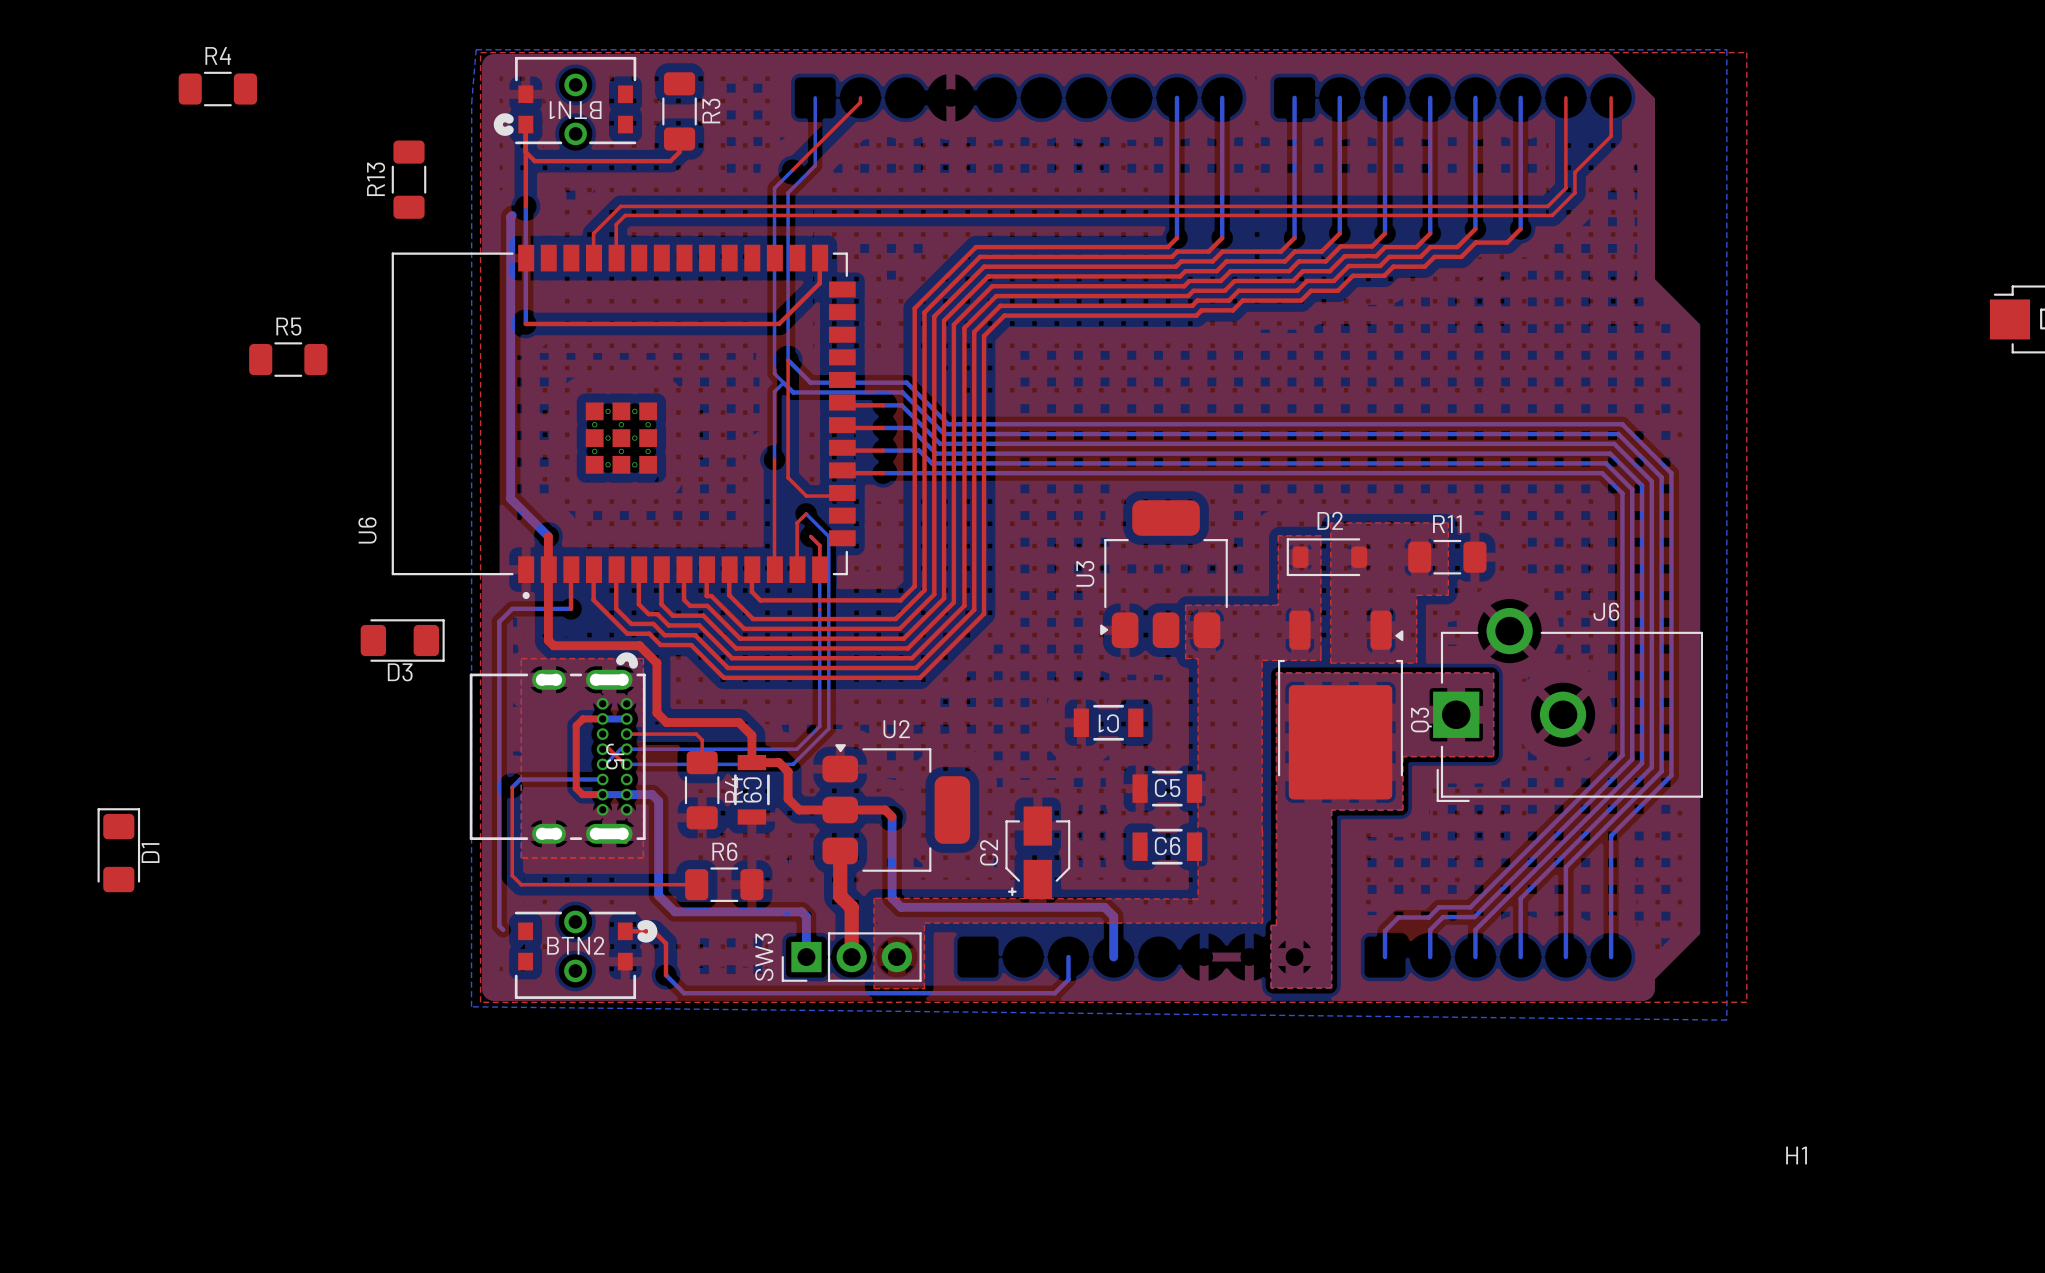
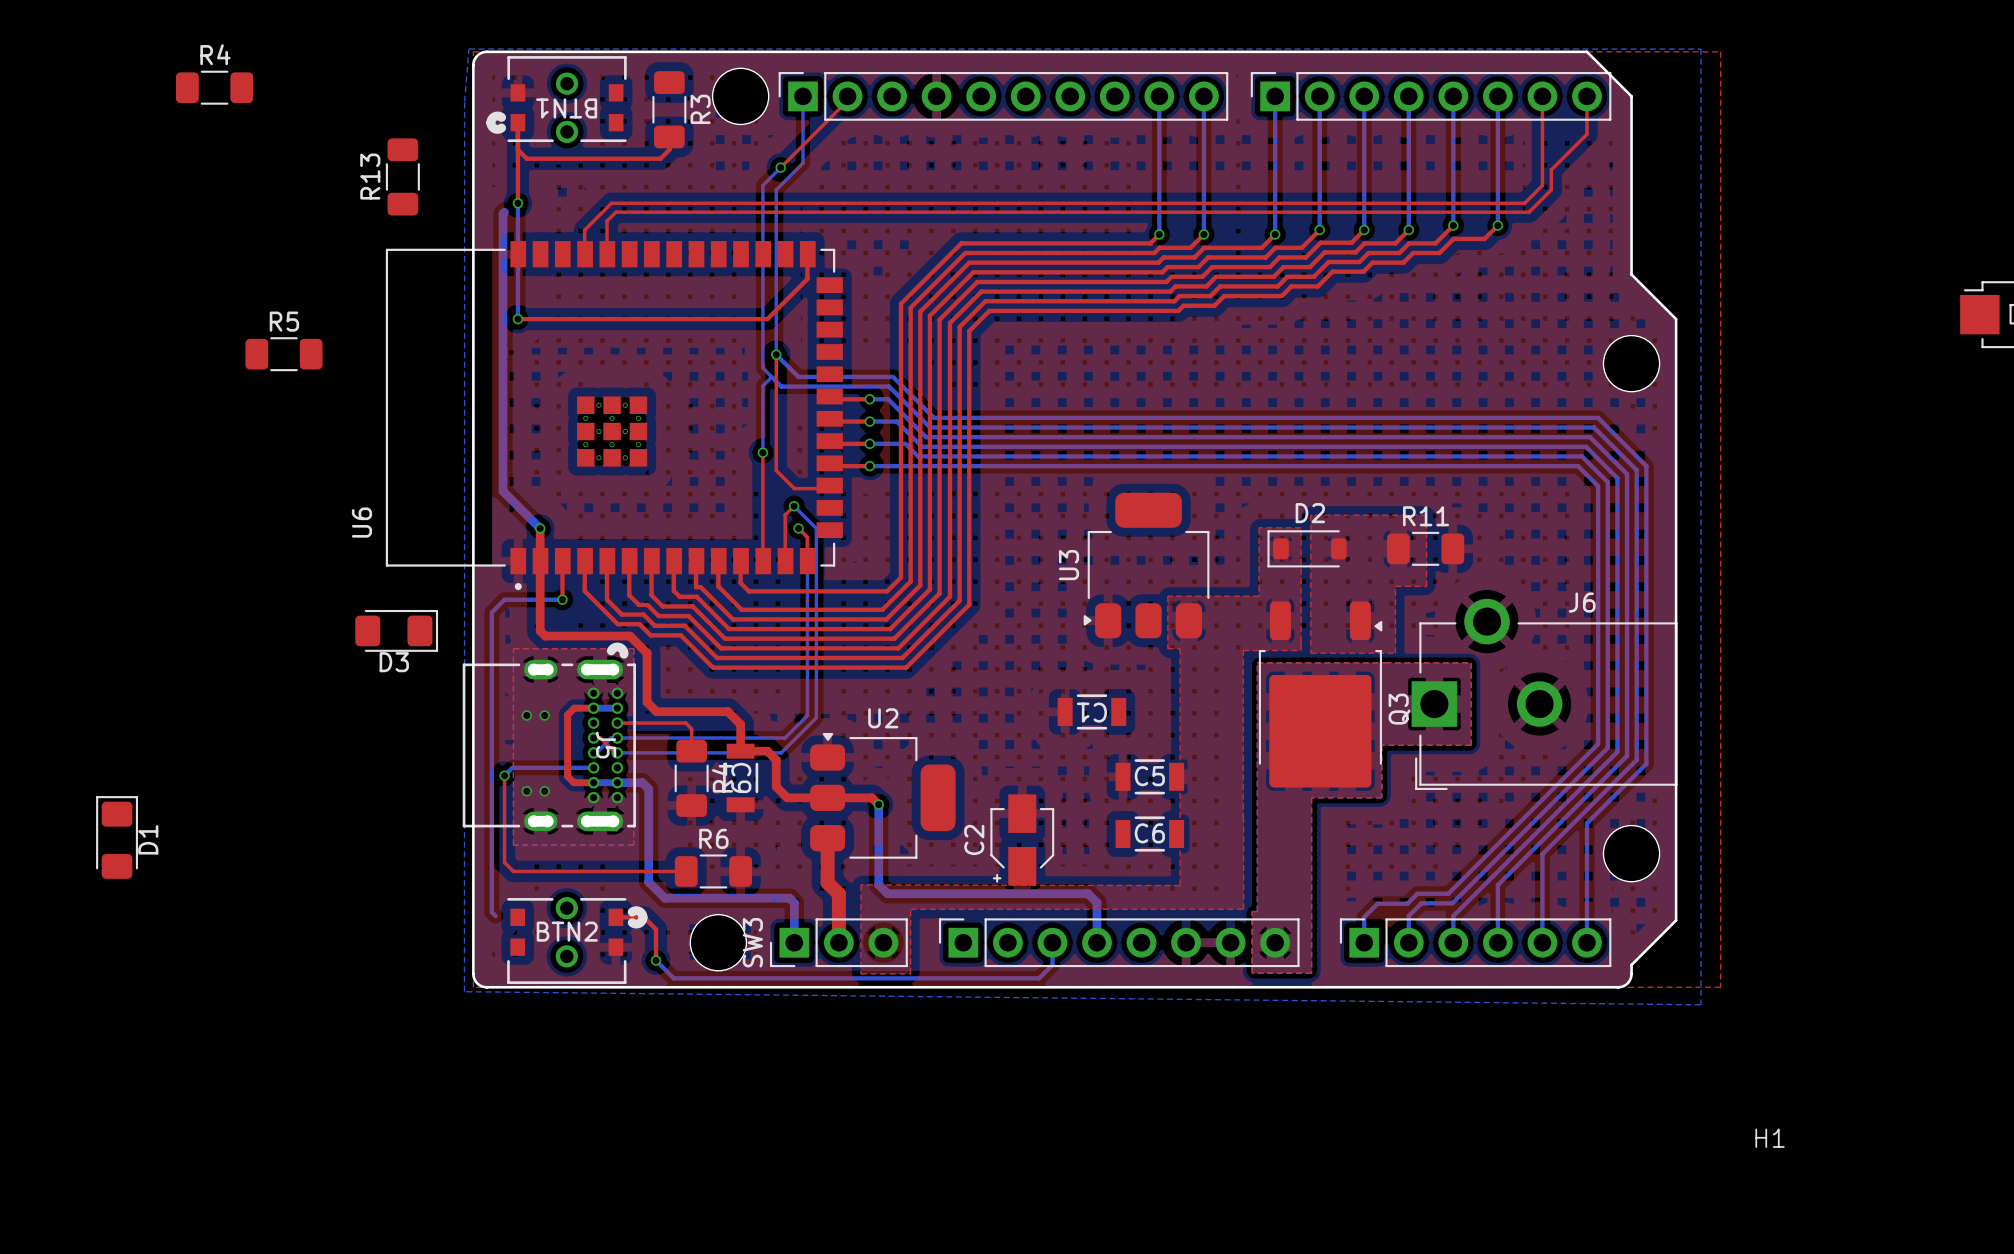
board edge: none -> (486, 51) (1586, 51) (1631, 96) (1631, 274) (1676, 319) (1676, 920) (1631, 964) (1631, 975) (1628, 982) (1618, 987) (486, 987) (478, 984) (473, 973) (473, 65) (477, 55) (486, 51)
part: none -> (740, 96)
part: none -> (1003, 96)
part: none -> (1431, 96)
via: none -> (780, 167)
via: none -> (517, 203)
via: none -> (1453, 225)
via: none -> (1497, 225)
via: none -> (1319, 230)
via: none -> (1364, 230)
via: none -> (1408, 230)
via: none -> (1159, 234)
via: none -> (1203, 234)
via: none -> (1275, 234)
via: none -> (517, 319)
via: none -> (776, 354)
part: none -> (1631, 363)
via: none -> (869, 399)
via: none -> (869, 421)
via: none -> (869, 443)
via: none -> (762, 452)
via: none -> (869, 466)
via: none -> (794, 506)
via: none -> (540, 528)
via: none -> (798, 528)
via: none -> (562, 599)
via: none -> (526, 715)
via: none -> (544, 715)
via: none -> (504, 775)
via: none -> (526, 791)
via: none -> (544, 791)
via: none -> (878, 804)
part: none -> (1631, 853)
part: none -> (718, 942)
part: none -> (1119, 942)
part: none -> (1475, 942)
via: none -> (656, 960)

